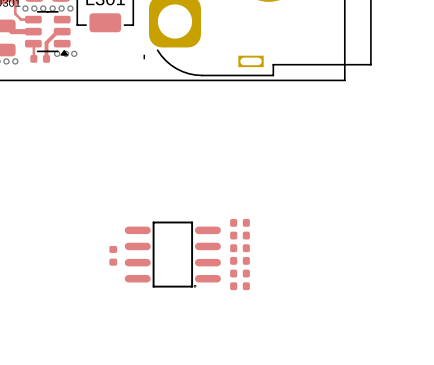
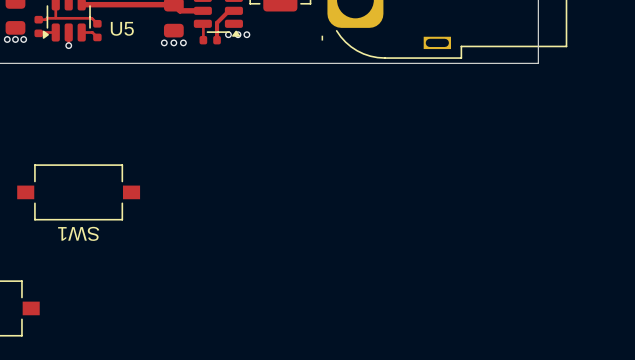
part: (240, 222) -> none
part: (240, 235) -> none
part: (240, 248) -> none
part: (172, 254) -> none
part: (113, 255) -> none
part: (240, 260) -> none
part: (240, 273) -> none
part: (240, 286) -> none

